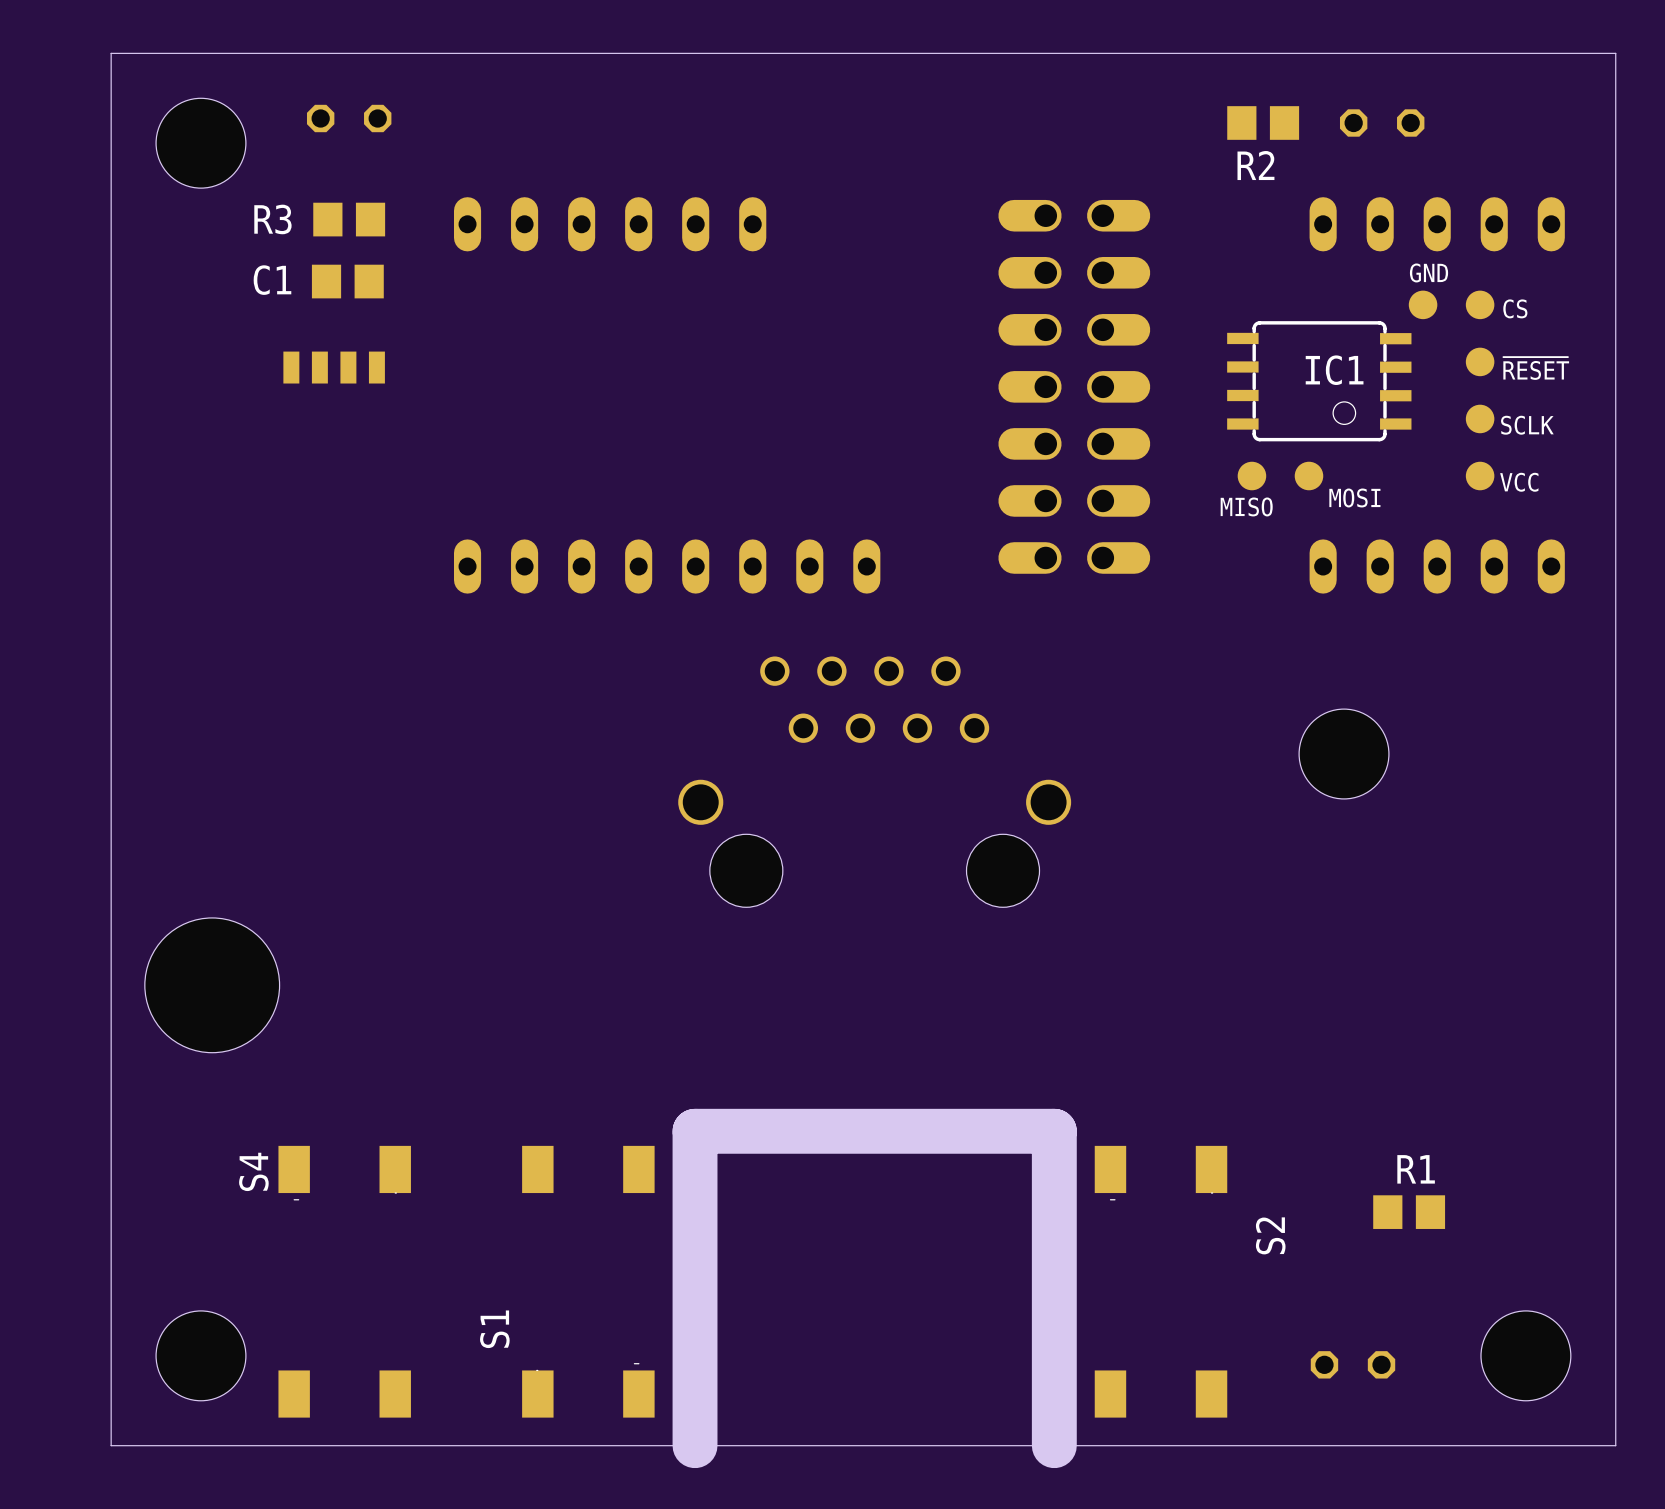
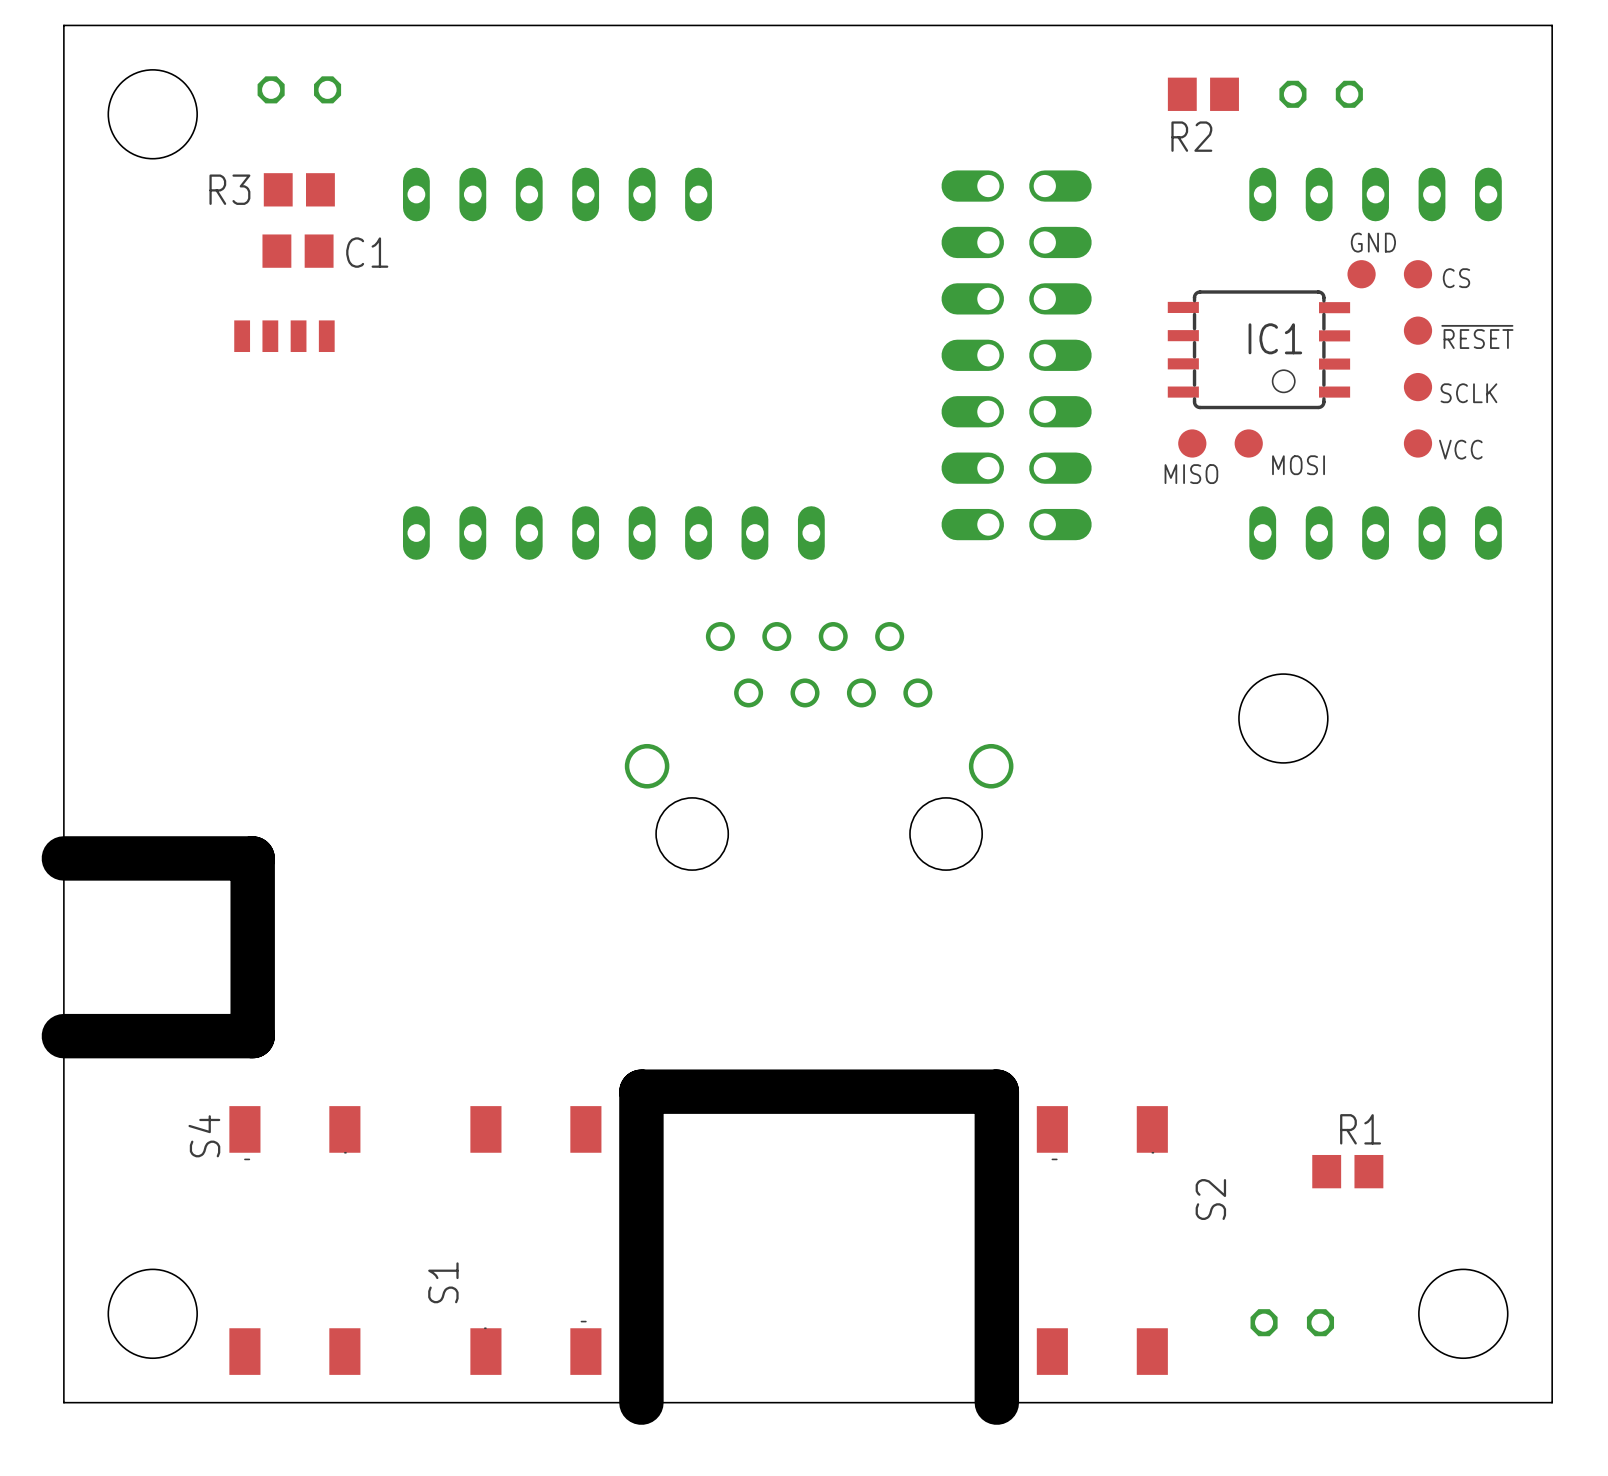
C1 name position: C1 (272, 280) -> C1 (367, 252)
board edge: none -> (63, 858) (252, 858) (252, 1036) (63, 1036)
hole: (212, 985) -> none

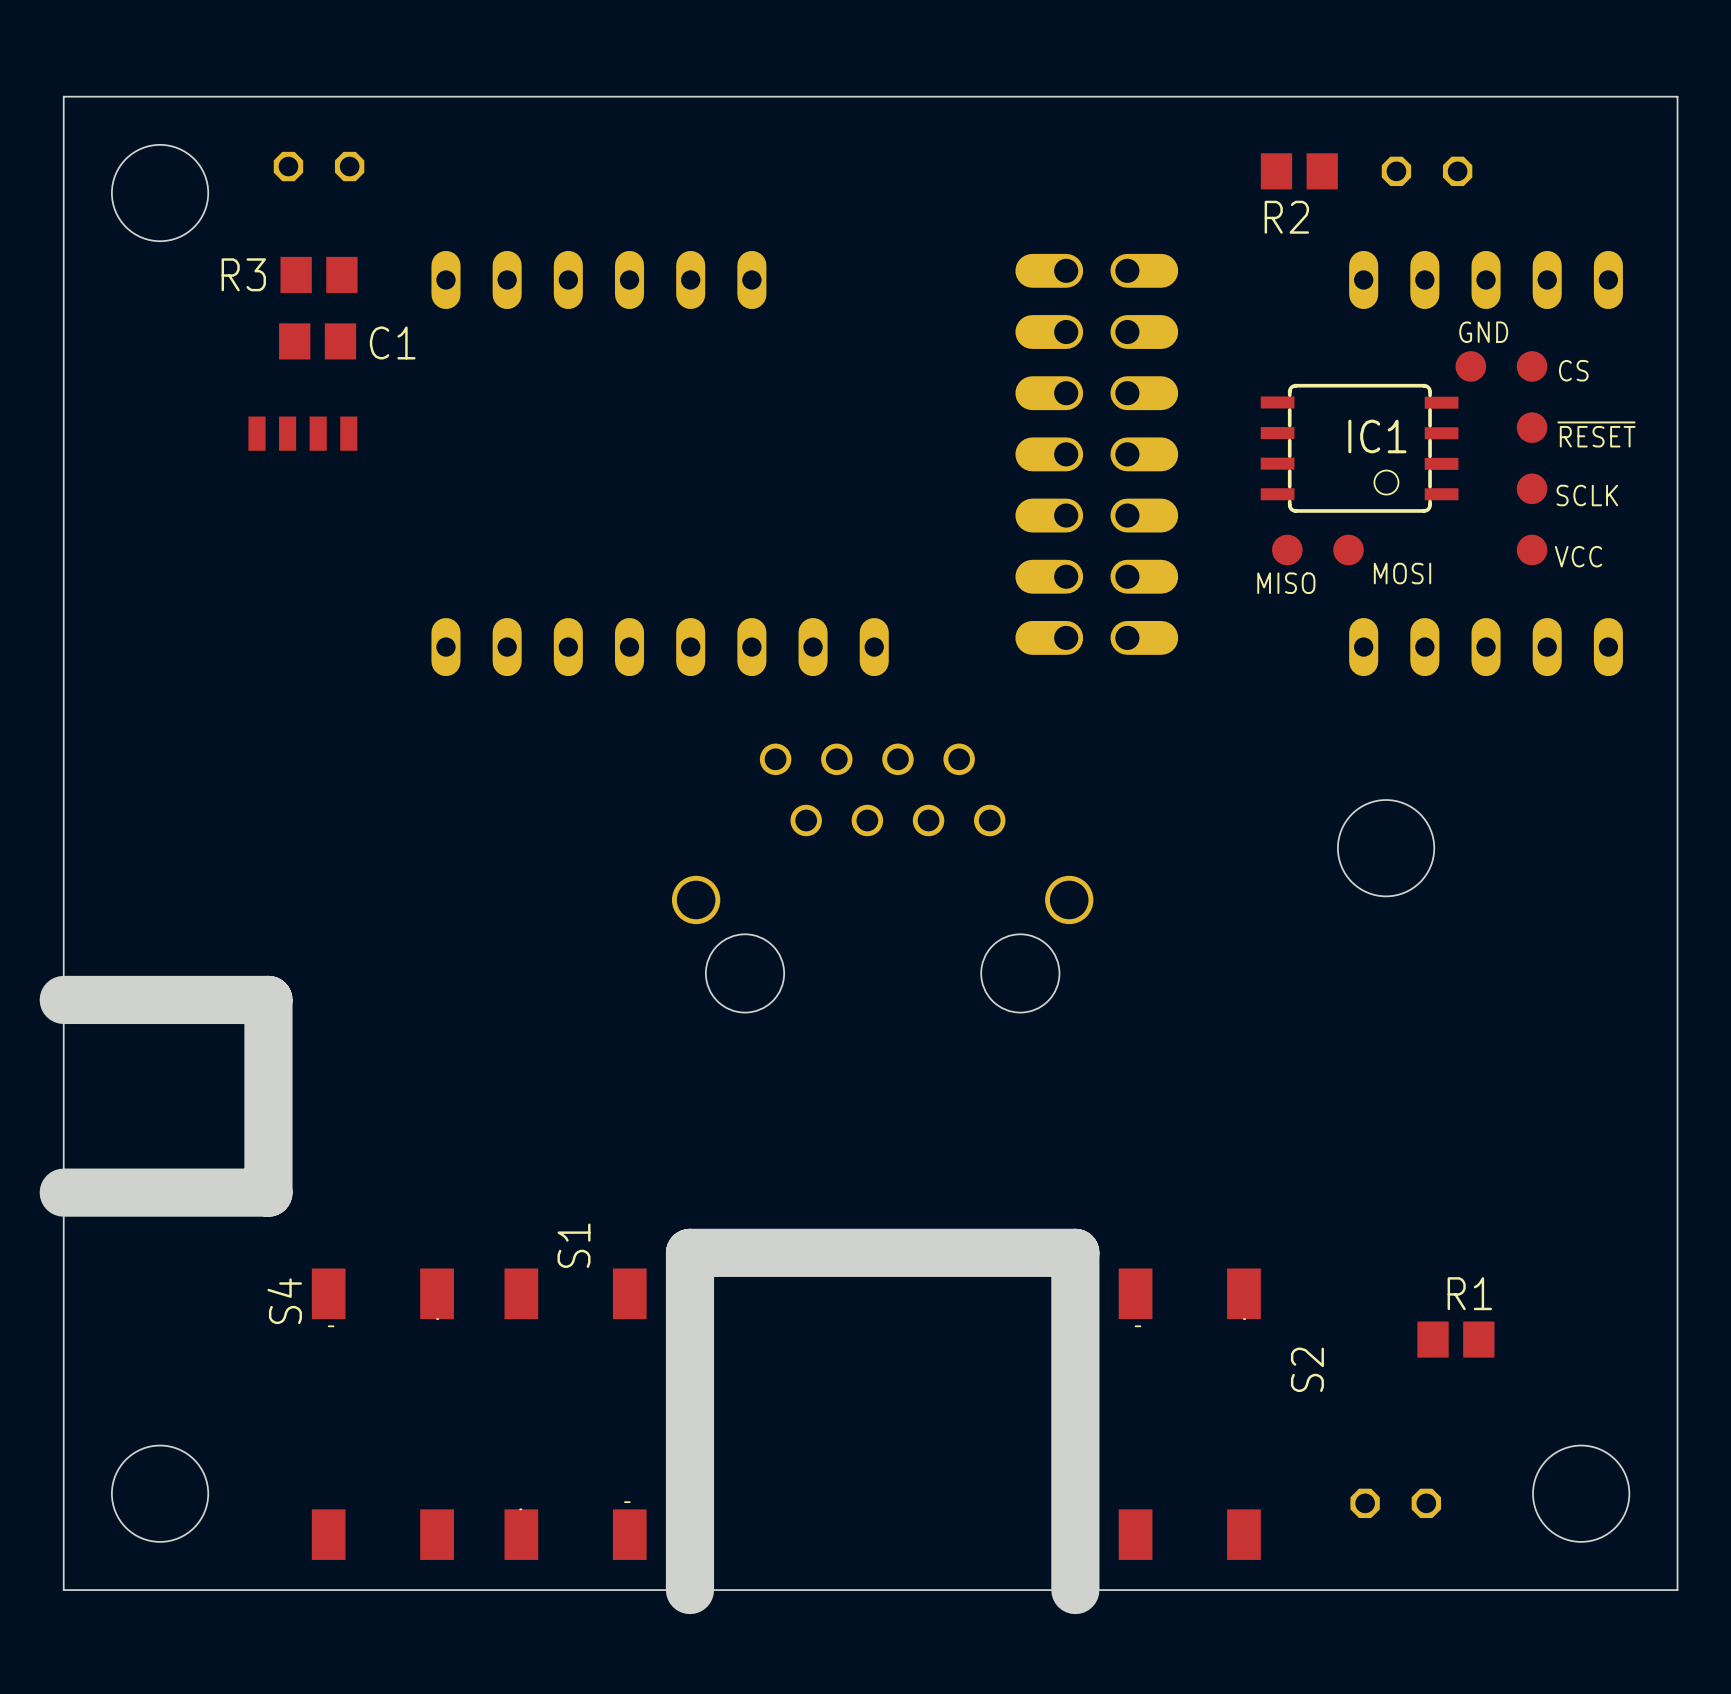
S4 position: (294, 1240) -> (382, 1414)
S1 name position: S1 (443, 1282) -> S1 (574, 1245)

